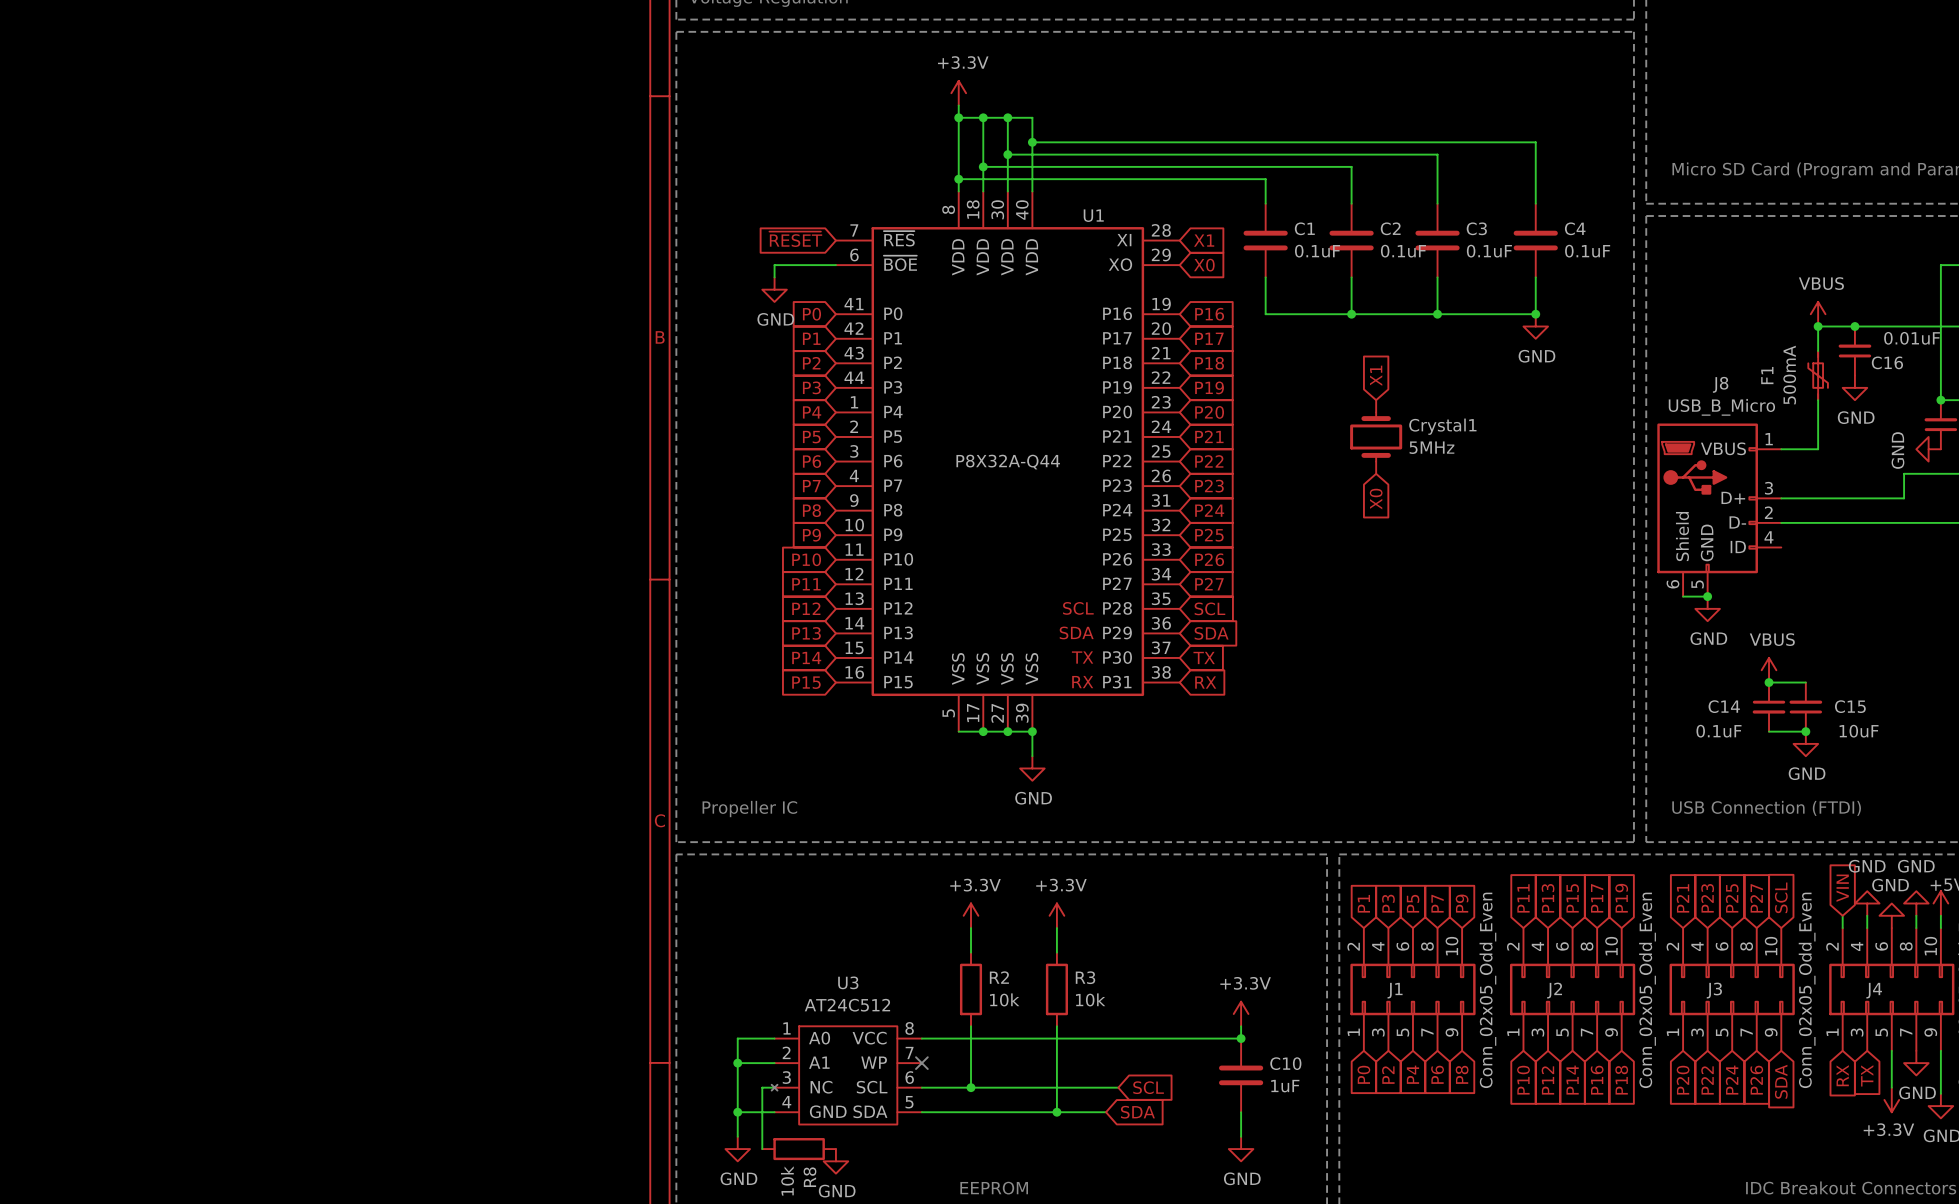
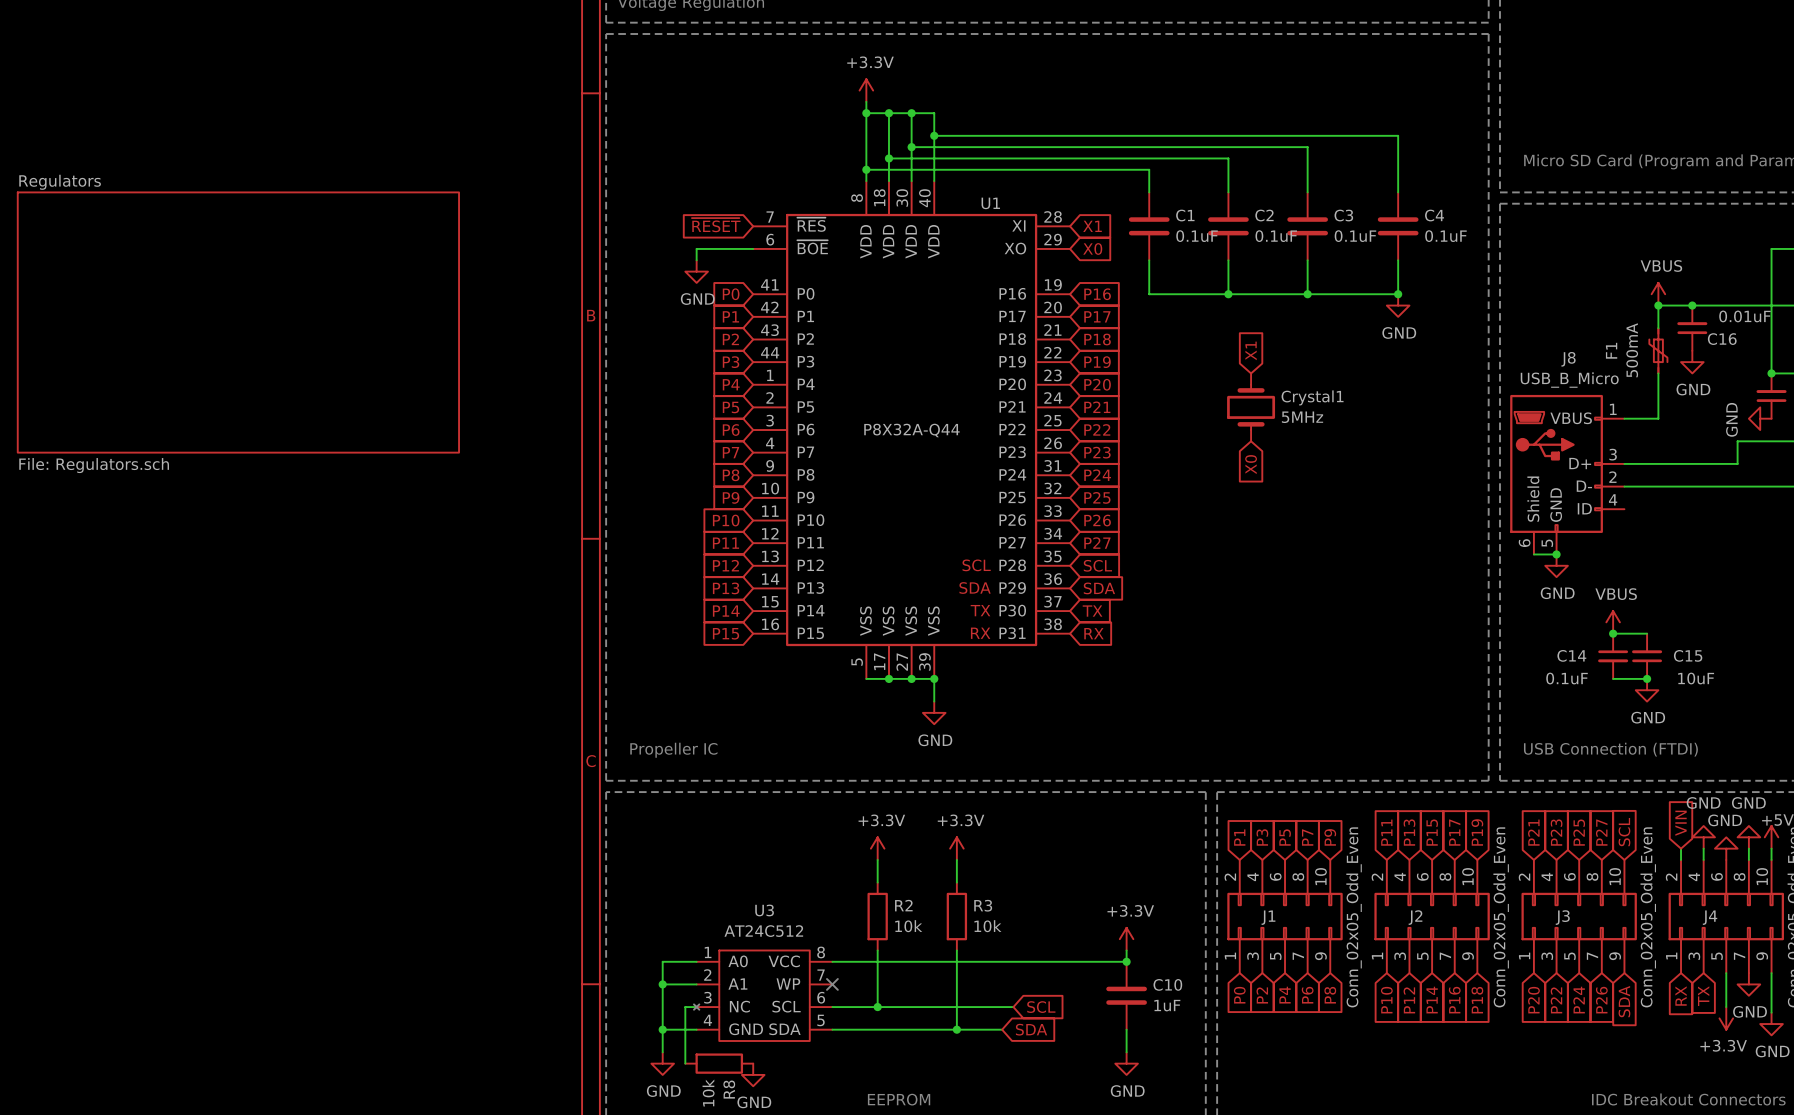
sheet Regulators: none -> File: Regulators.sch (238, 322)

